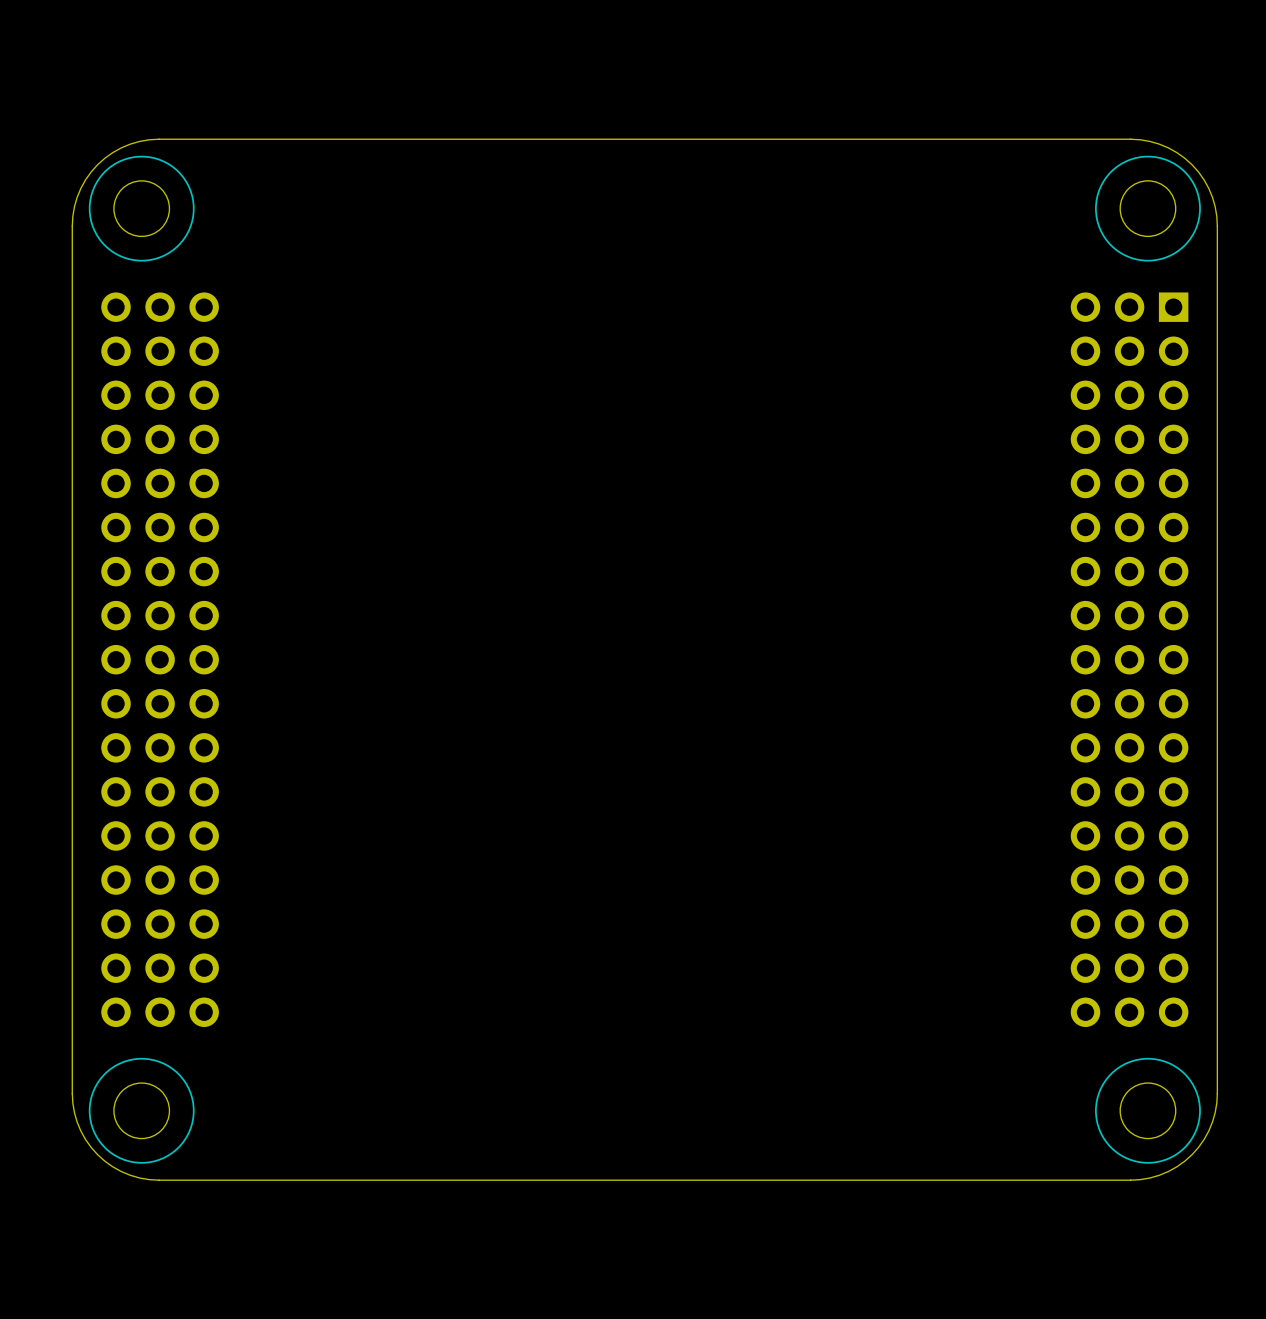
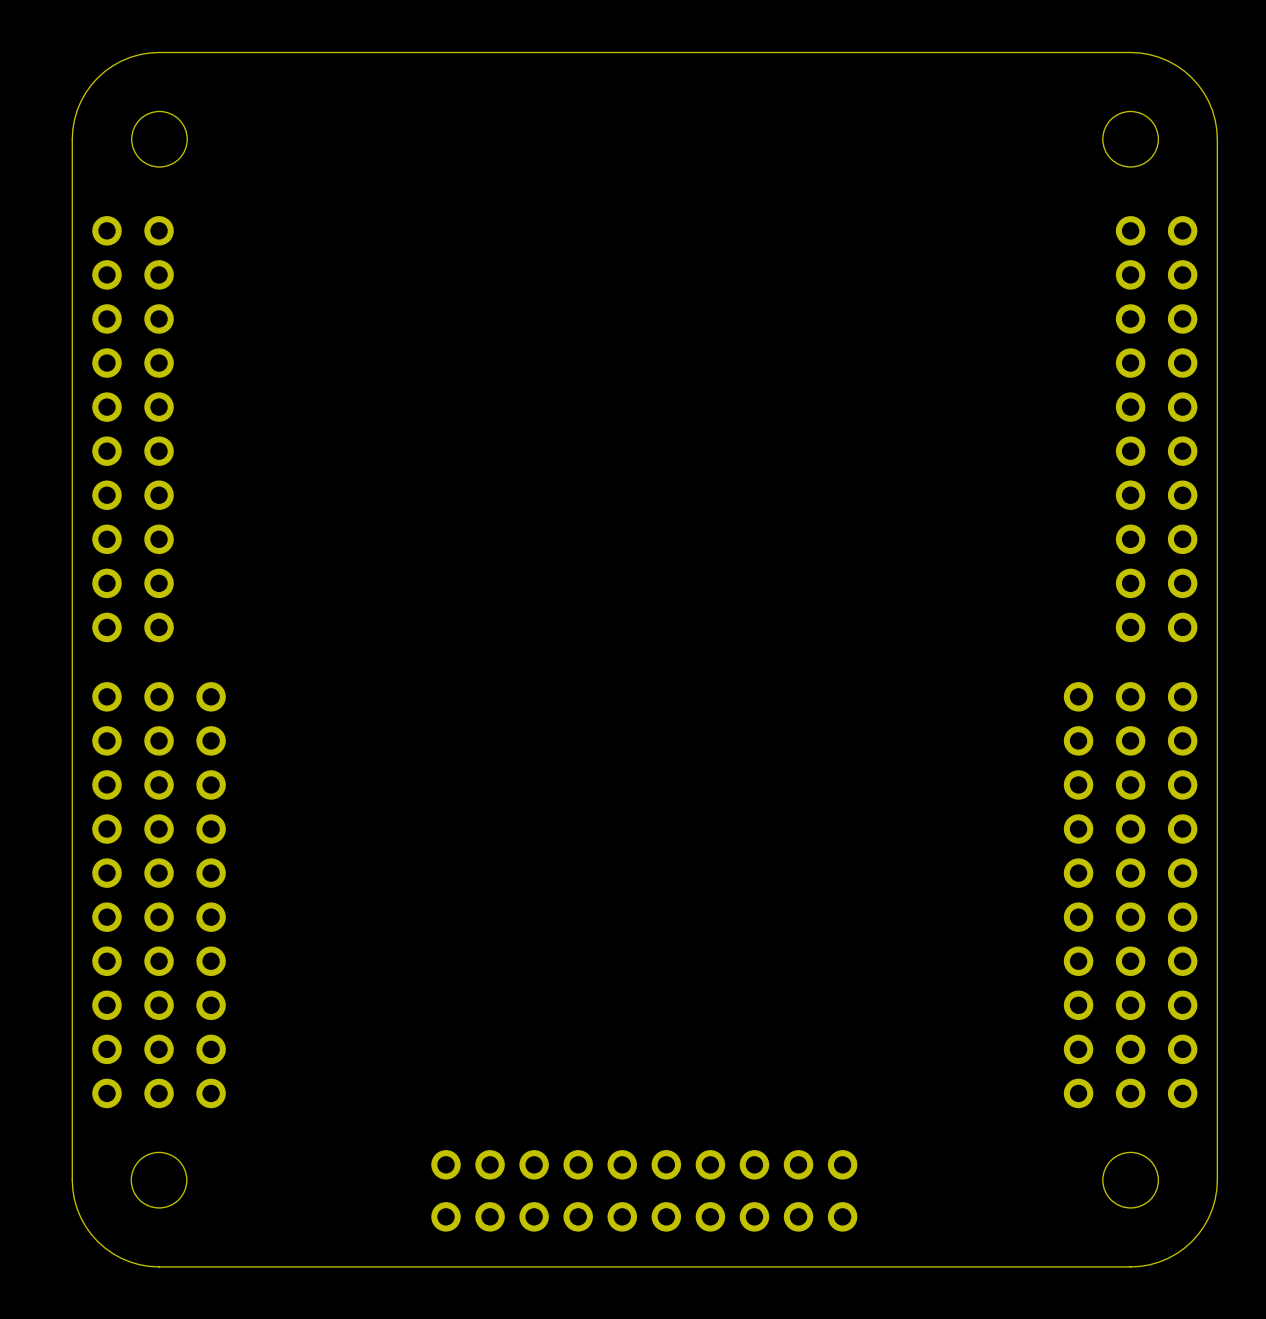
part footprint: [71, 138, 1218, 1181] -> [71, 52, 1218, 1268]

